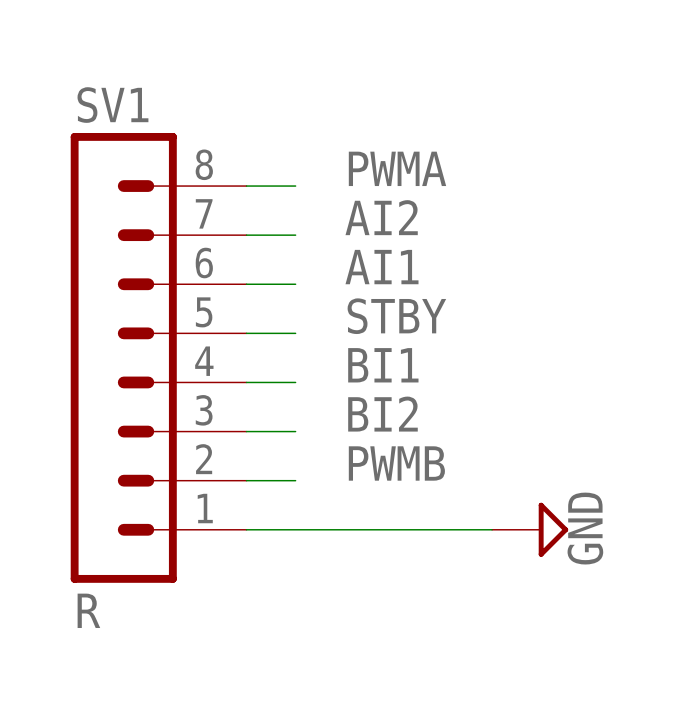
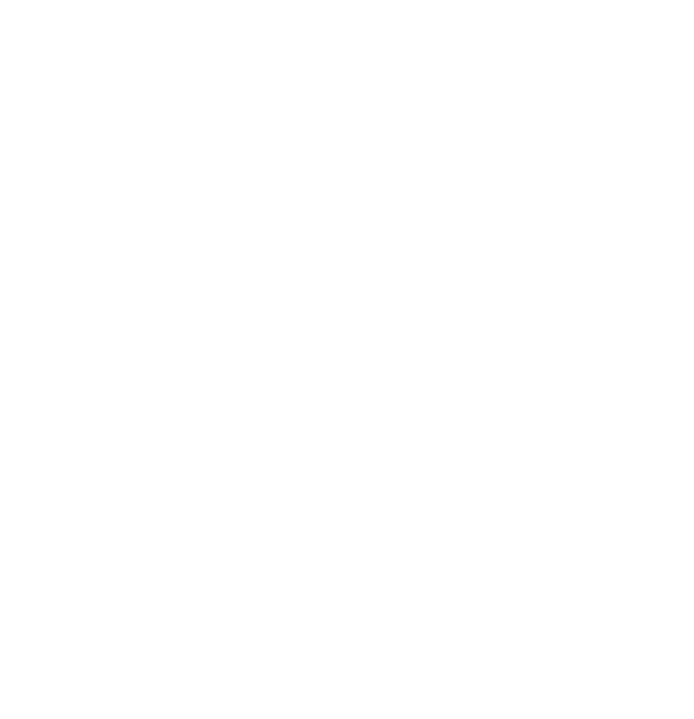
label: PWMA (397, 168) -> none
wire: (246, 186) (295, 186) -> none
label: AI2 (381, 217) -> none
wire: (246, 235) (295, 235) -> none
label: AI1 (382, 267) -> none
wire: (246, 284) (295, 284) -> none
label: STBY (396, 316) -> none
wire: (246, 333) (295, 333) -> none
SV1: R (158, 357) -> none
label: BI1 (383, 365) -> none
wire: (246, 382) (295, 382) -> none
label: BI2 (382, 414) -> none
wire: (246, 431) (295, 431) -> none
label: PWMB (396, 463) -> none
wire: (246, 480) (295, 480) -> none
wire: (246, 529) (492, 529) -> none
power symbol: GND (530, 529) -> none

